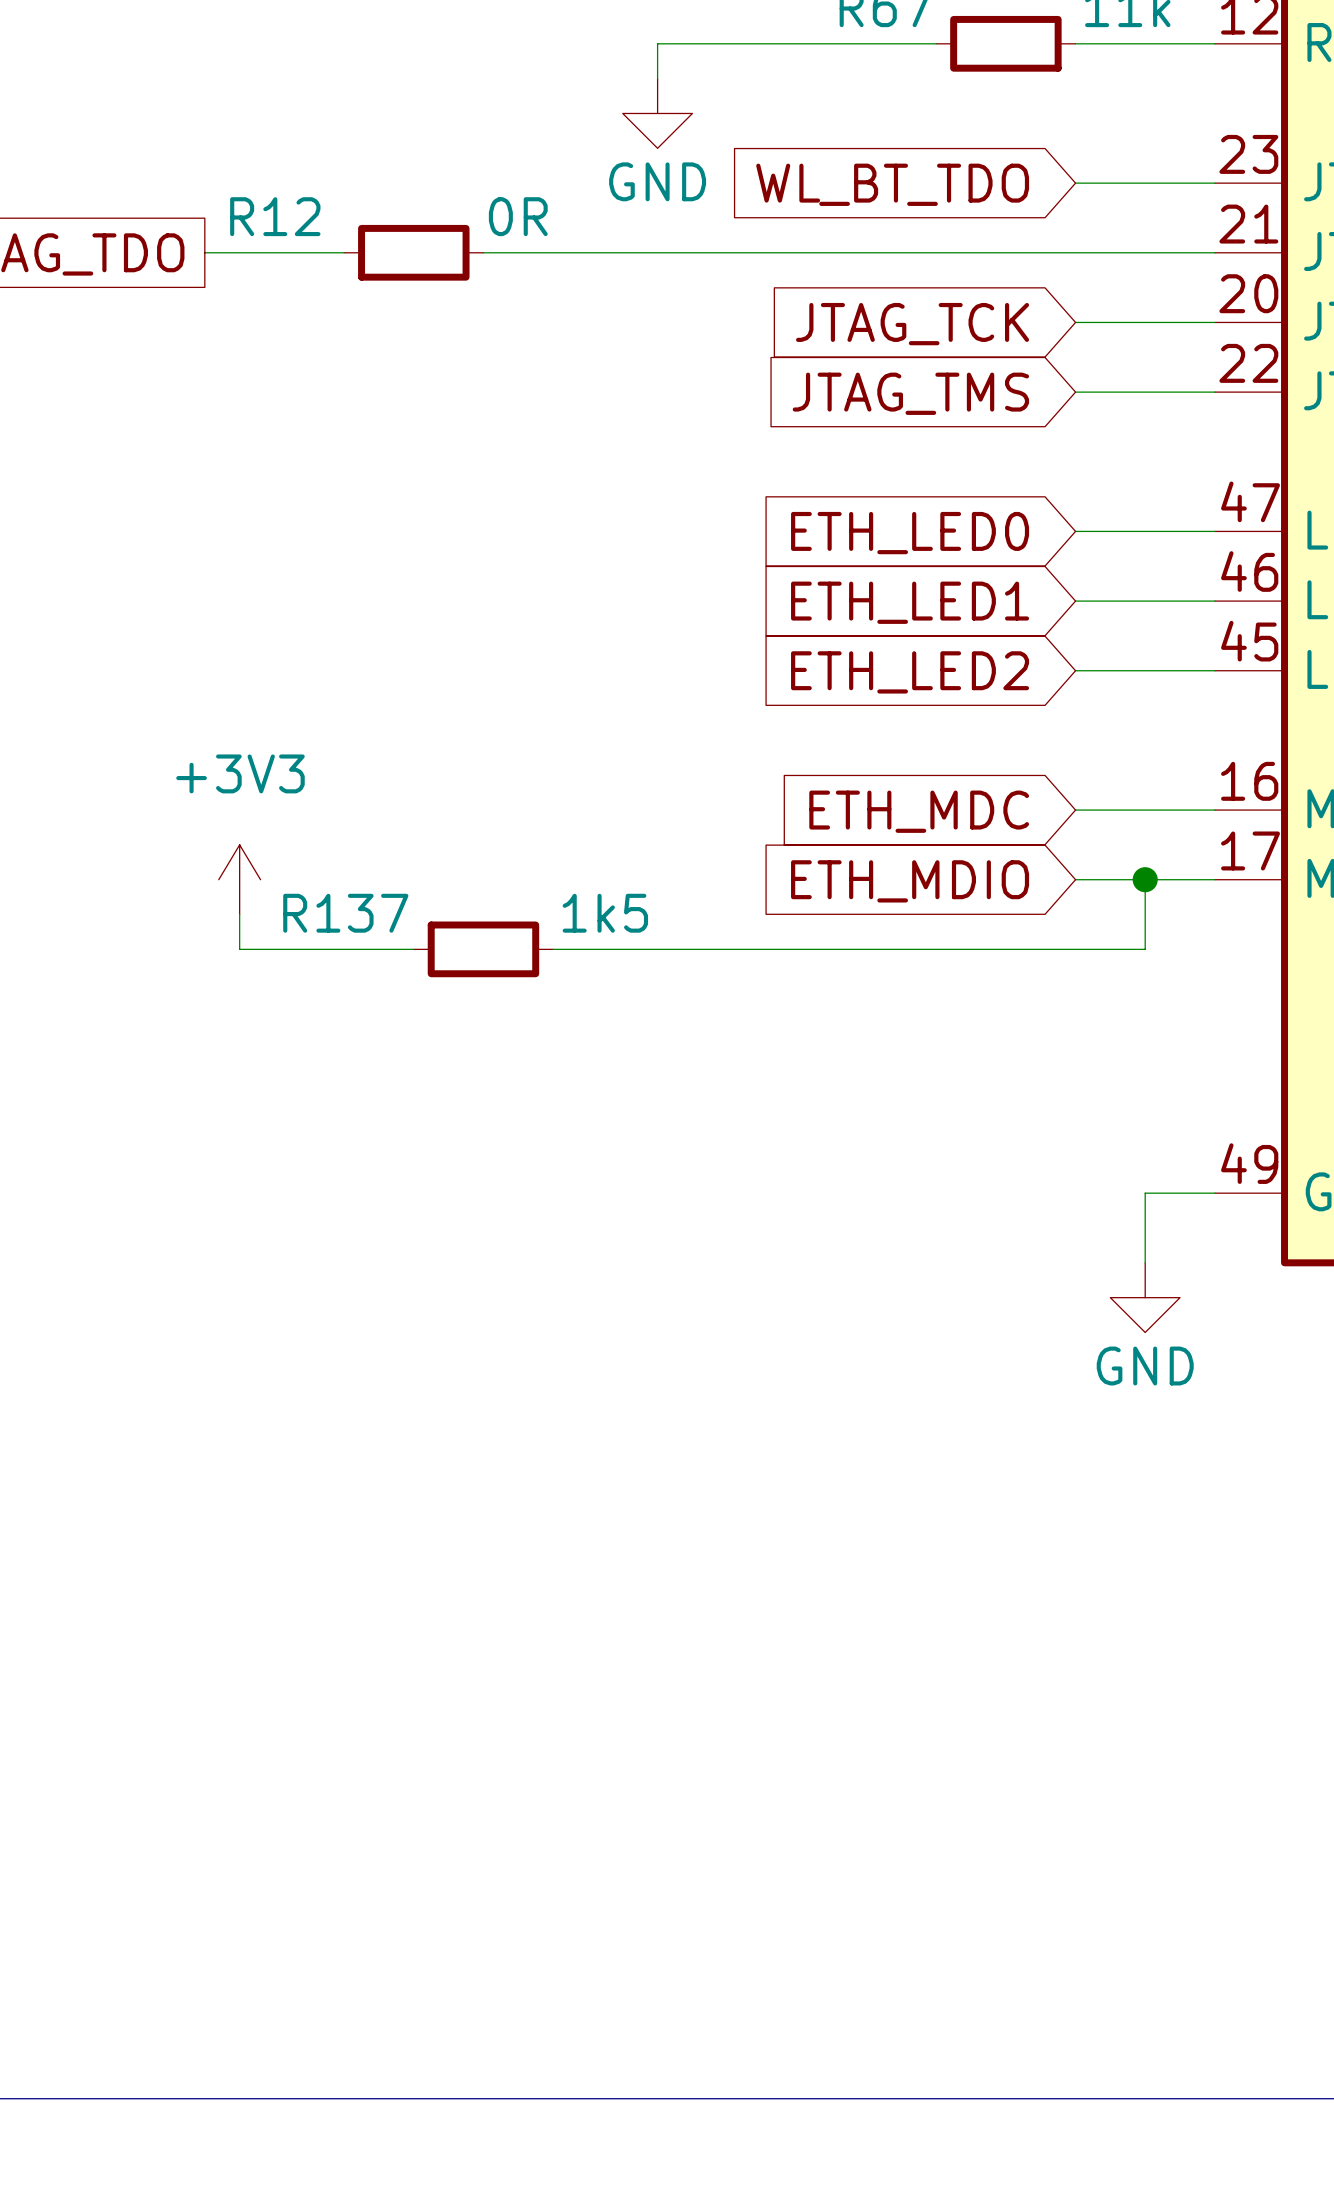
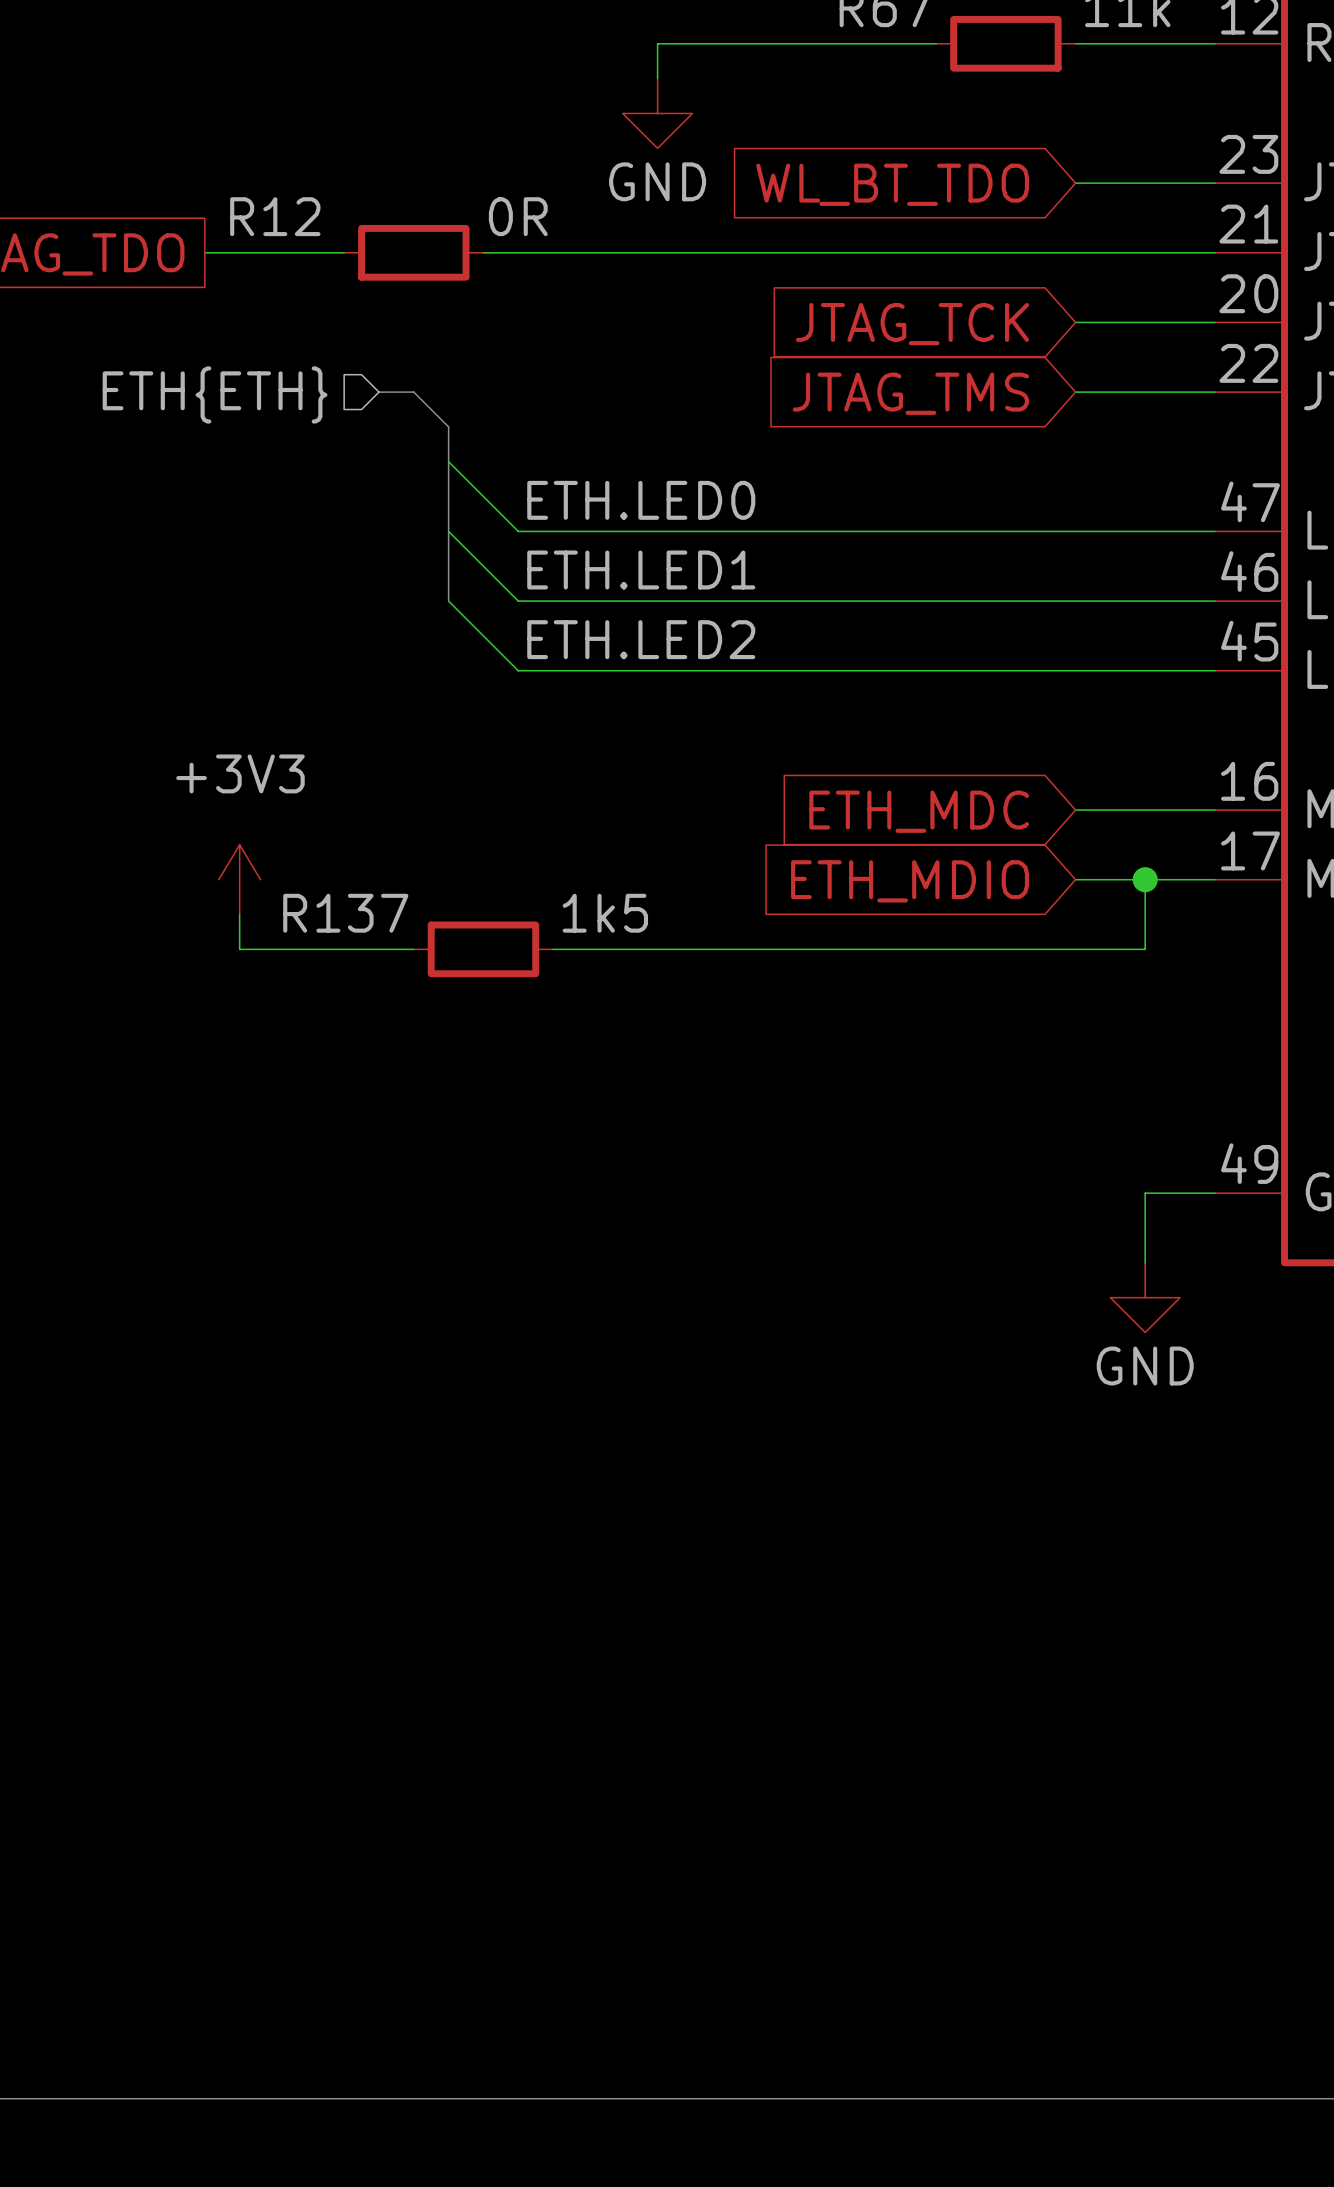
bus: none -> (378, 392) (413, 392) (448, 426) (448, 601)
hierarchical label: none -> ETH{ETH} (215, 394)
wire: none -> (448, 461) (518, 531) (1075, 531)
label: none -> ETH.LED0 (641, 500)
wire: none -> (448, 531) (518, 601) (1075, 601)
global label: ETH_LED0 (910, 533) -> none
label: none -> ETH.LED1 (641, 570)
wire: none -> (448, 601) (518, 670) (1075, 670)
global label: ETH_LED1 (910, 602) -> none
label: none -> ETH.LED2 (641, 639)
global label: ETH_LED2 (910, 672) -> none

